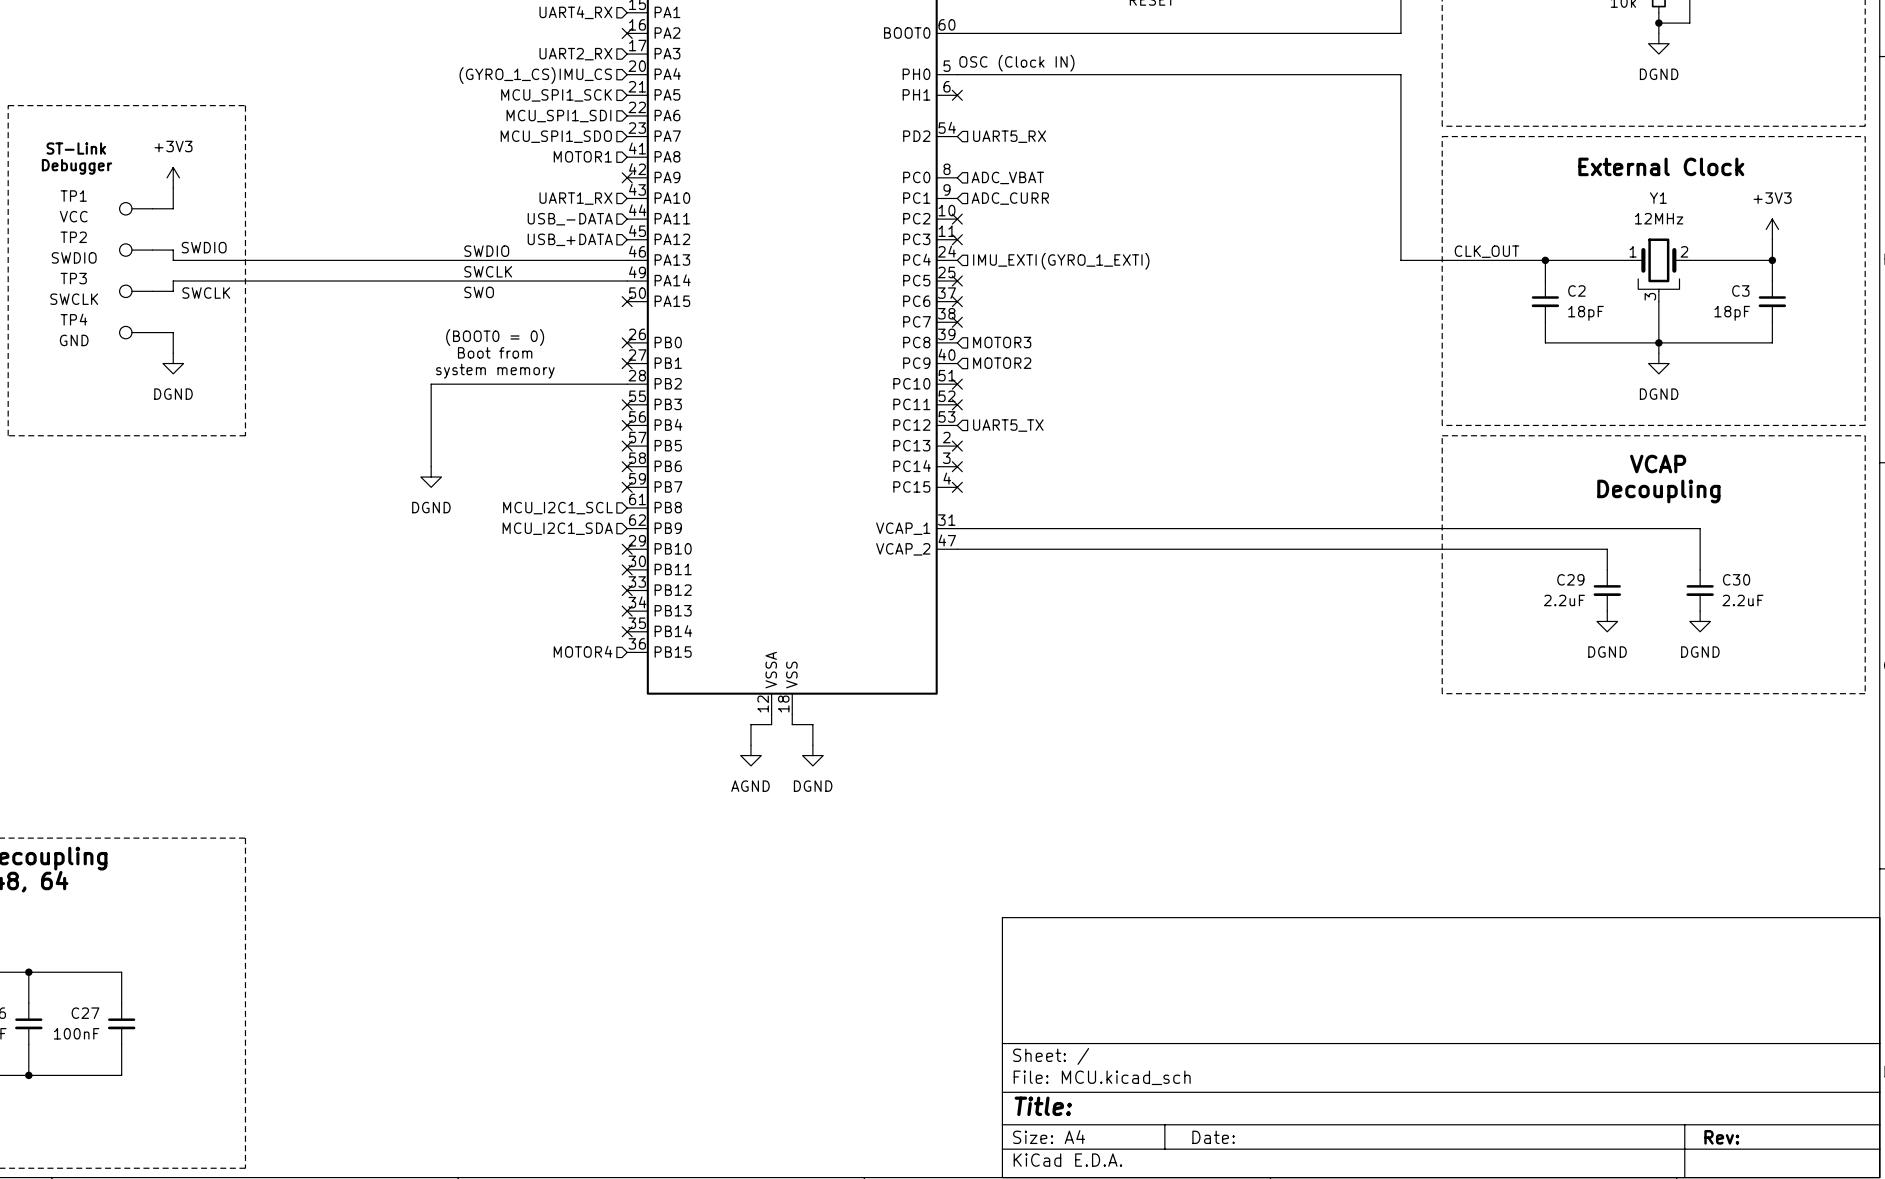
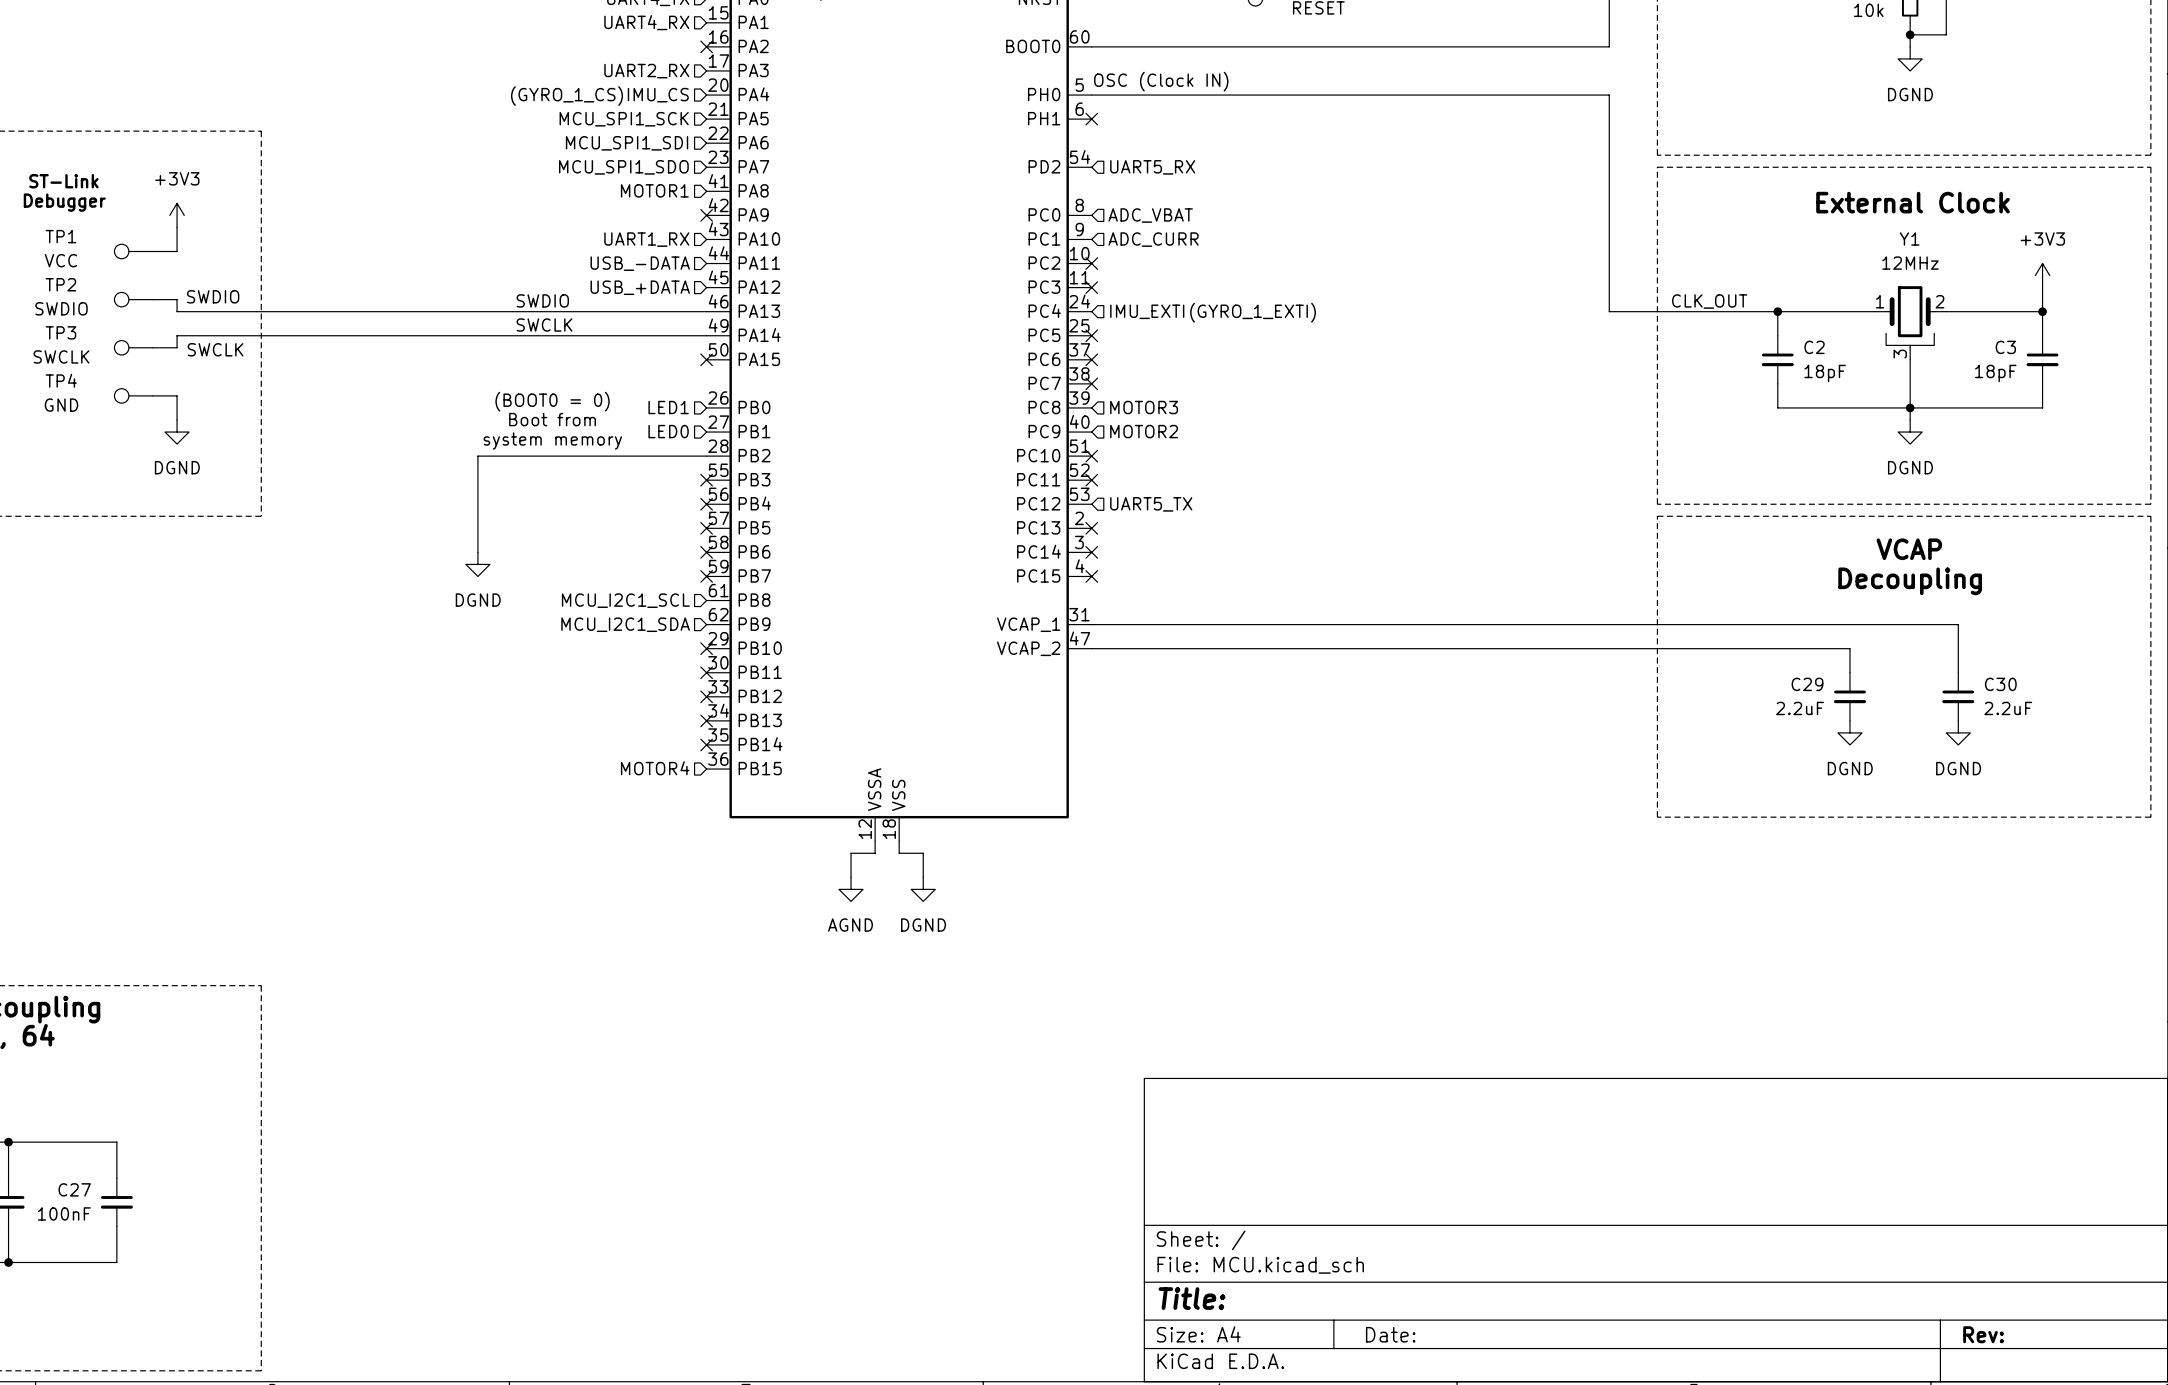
label: SWO (479, 292) -> none
hierarchical label: none -> LED1 (668, 407)
no-connect mark: (627, 342) -> none
hierarchical label: none -> LED0 (668, 431)
no-connect mark: (627, 363) -> none

